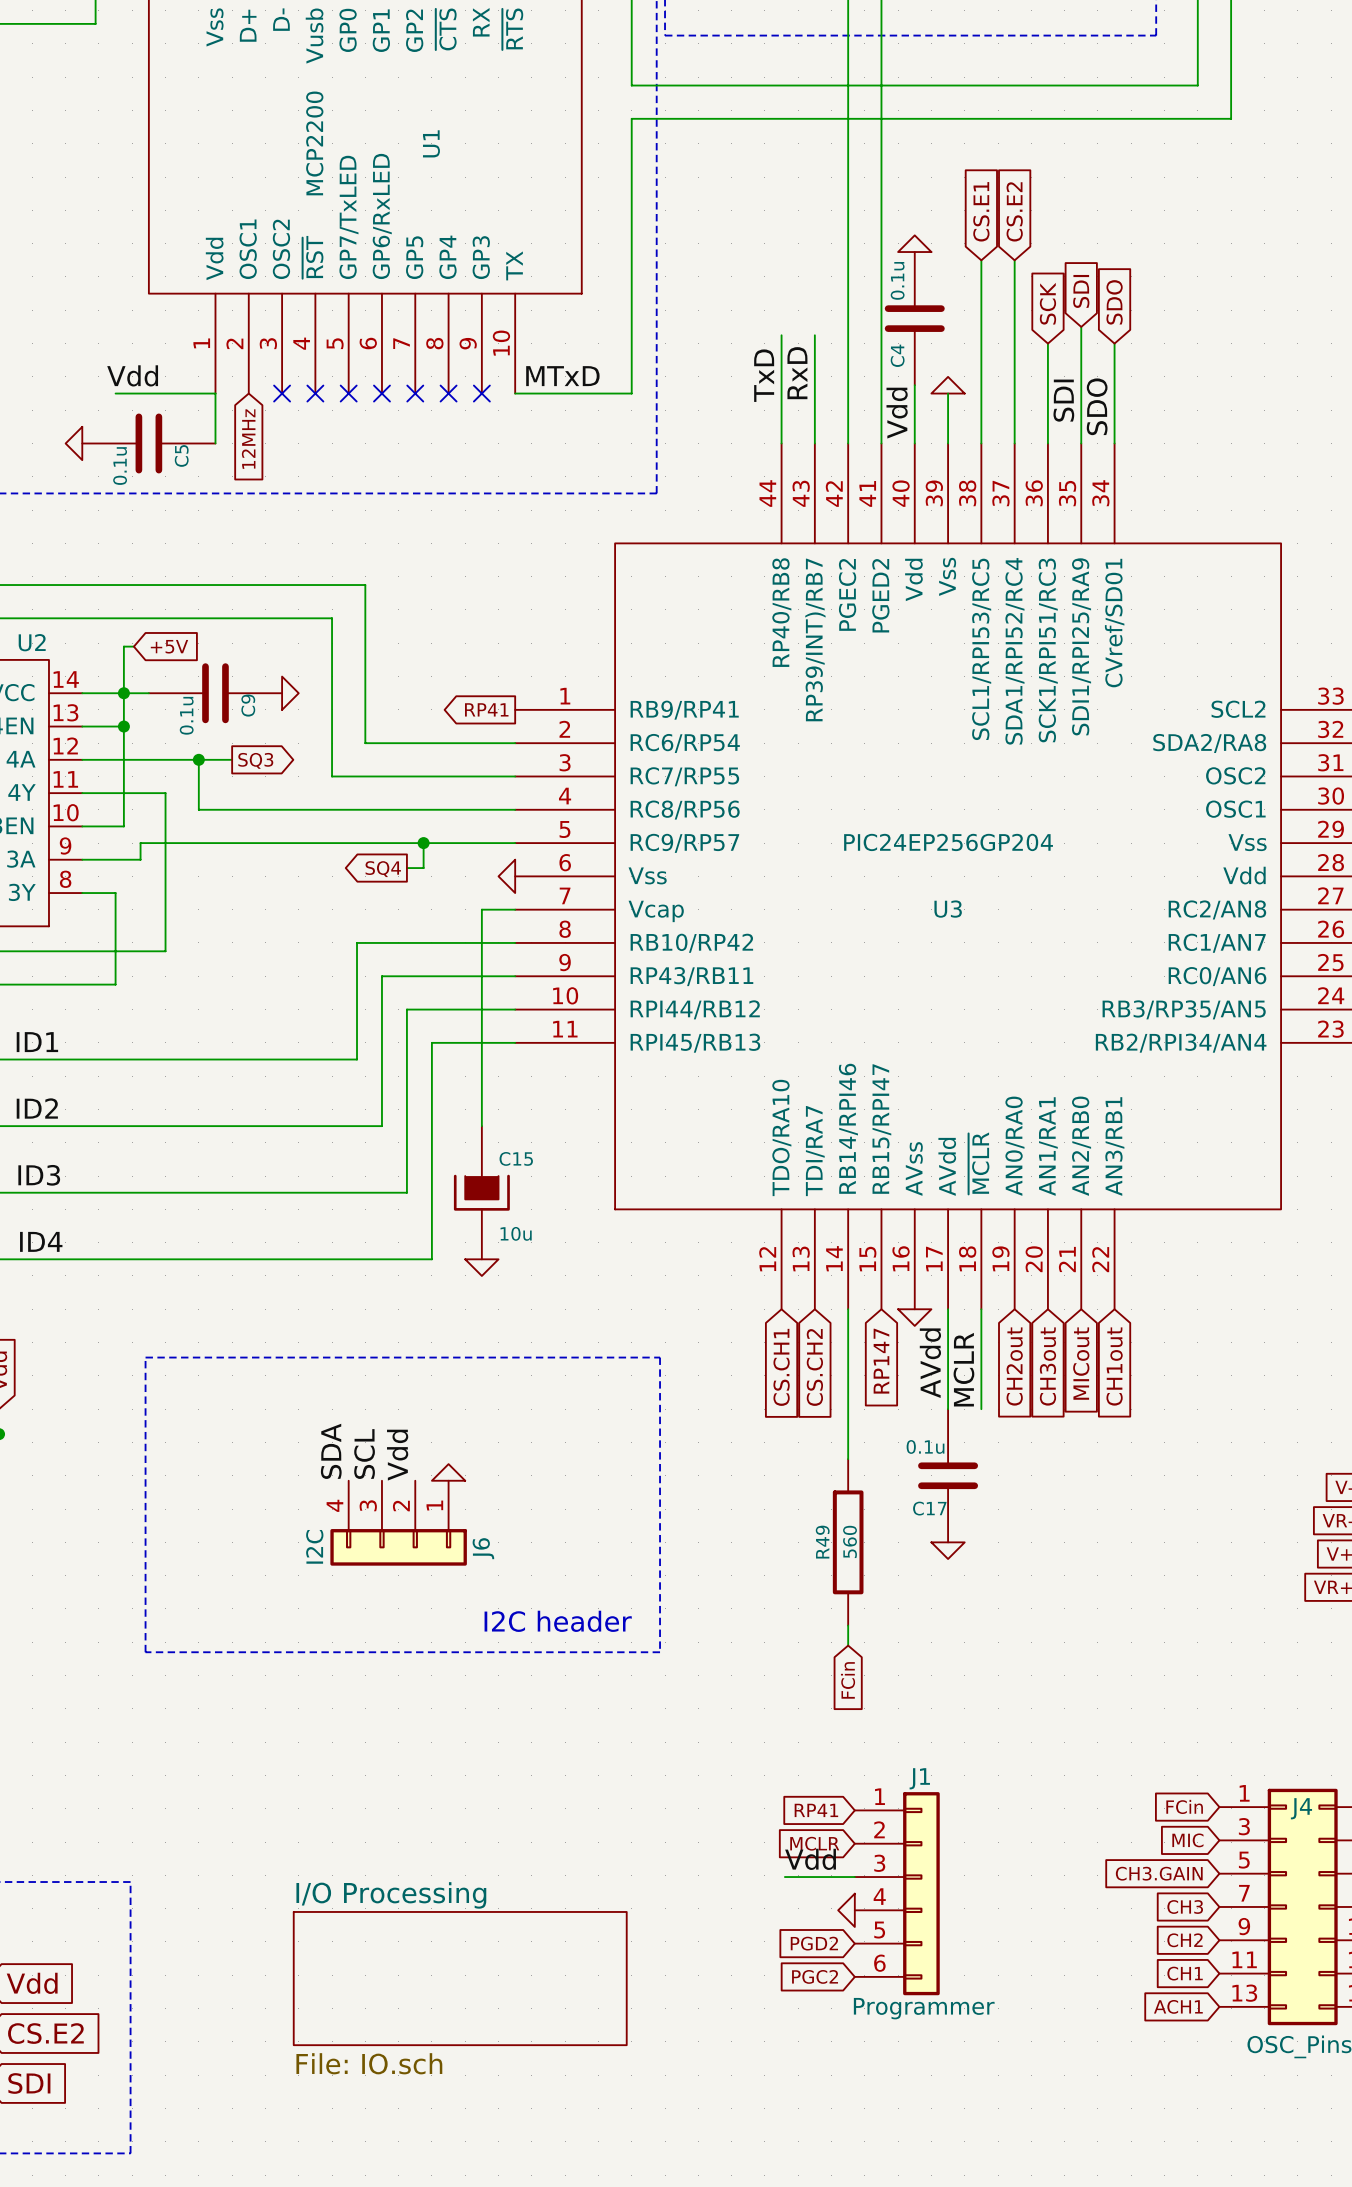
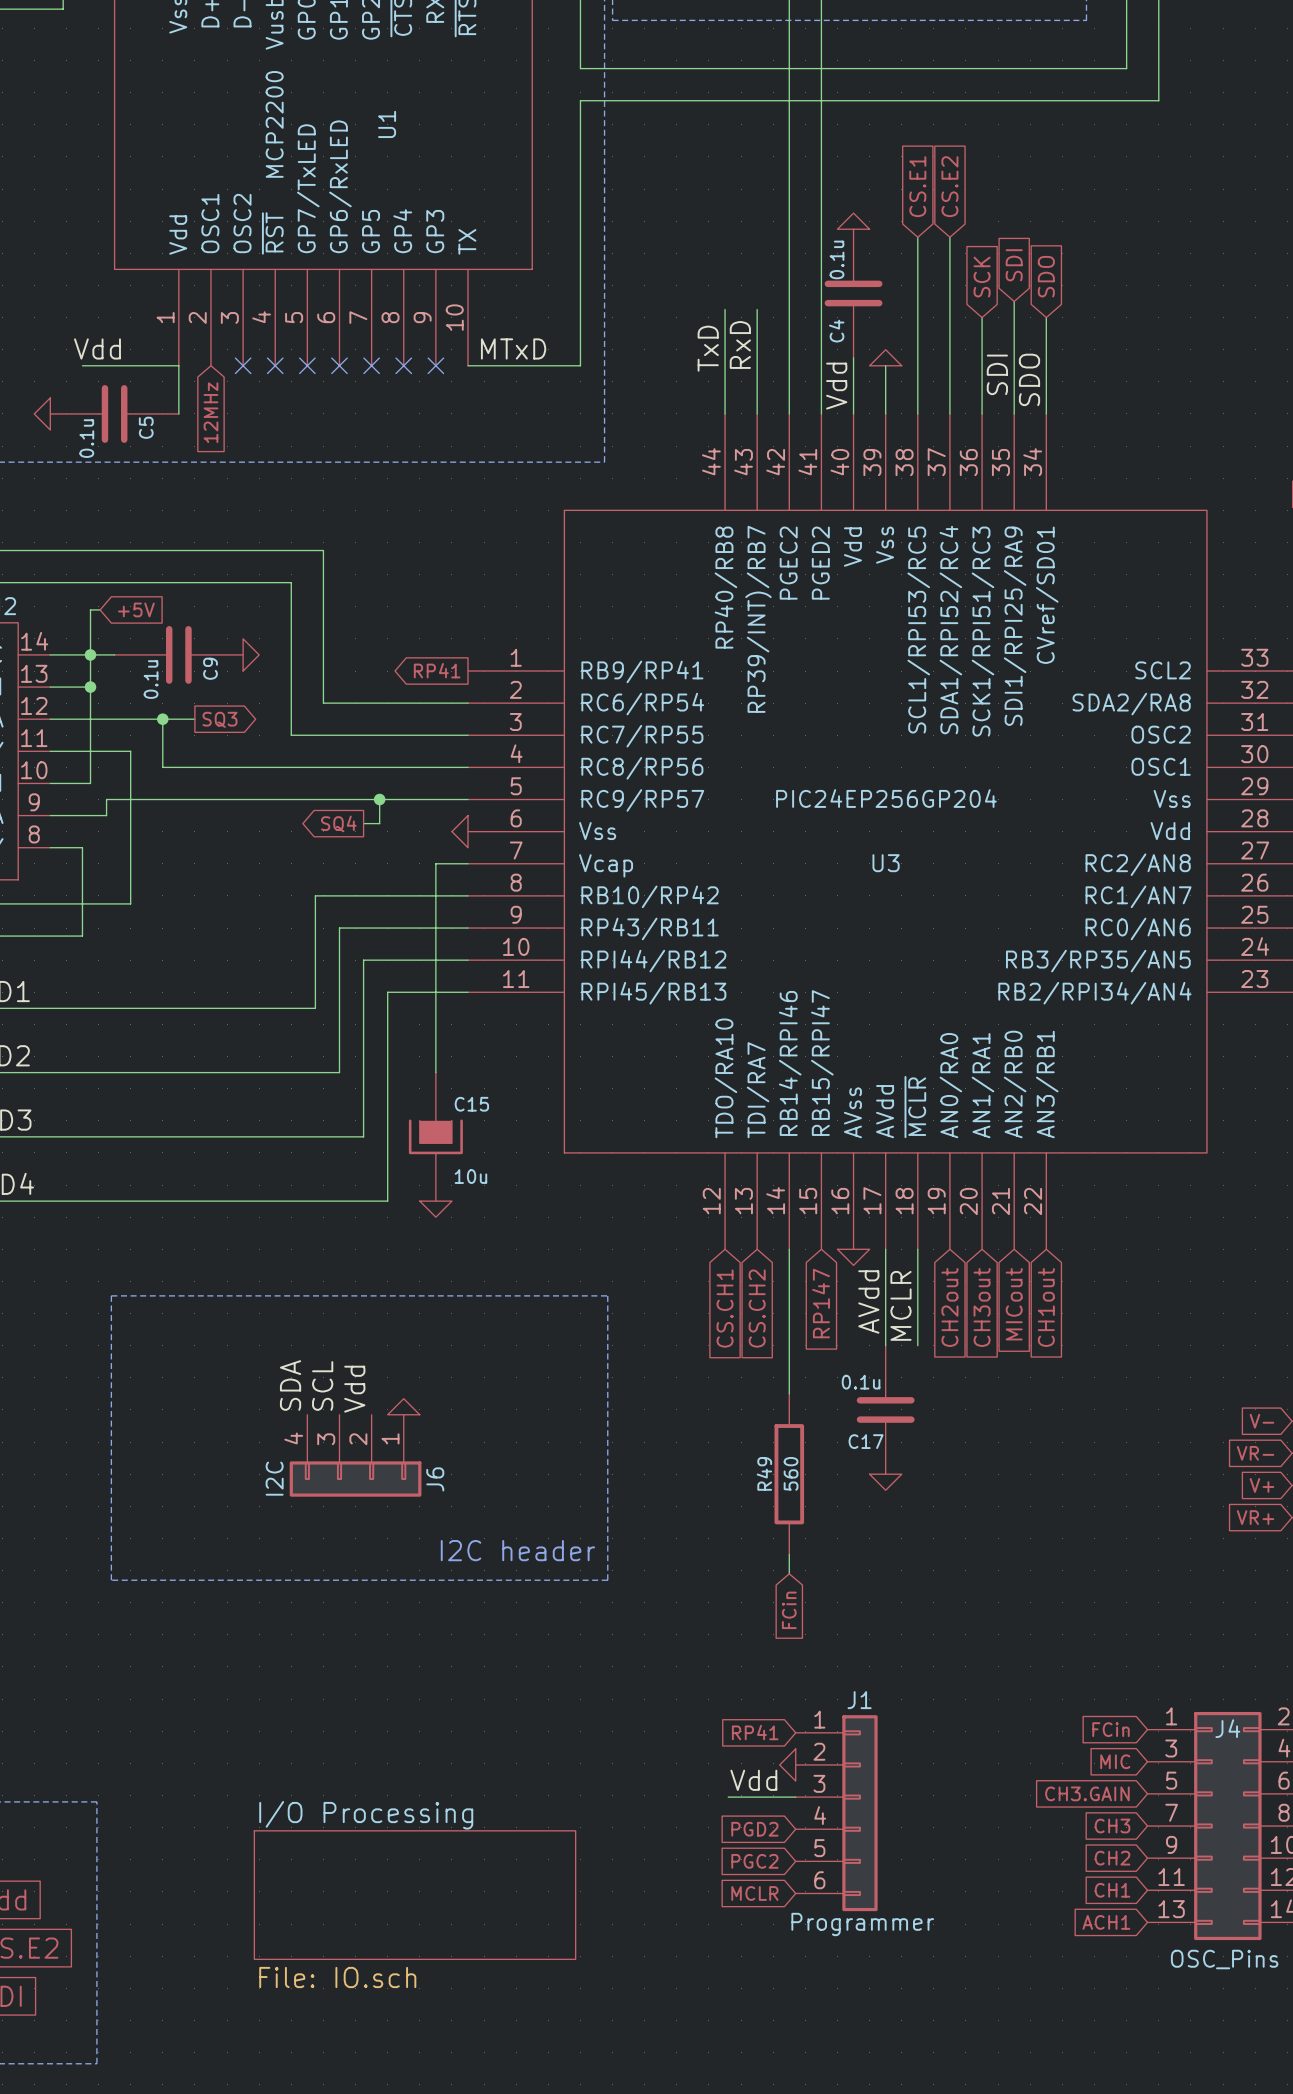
global label: MCLR (814, 1843) -> none
global label: none -> PGD2 (754, 1829)
power symbol position: (846, 1910) -> (787, 1764)
global label: PGD2 (814, 1943) -> PGC2 (754, 1861)
global label: PGC2 (815, 1976) -> MCLR (754, 1893)

